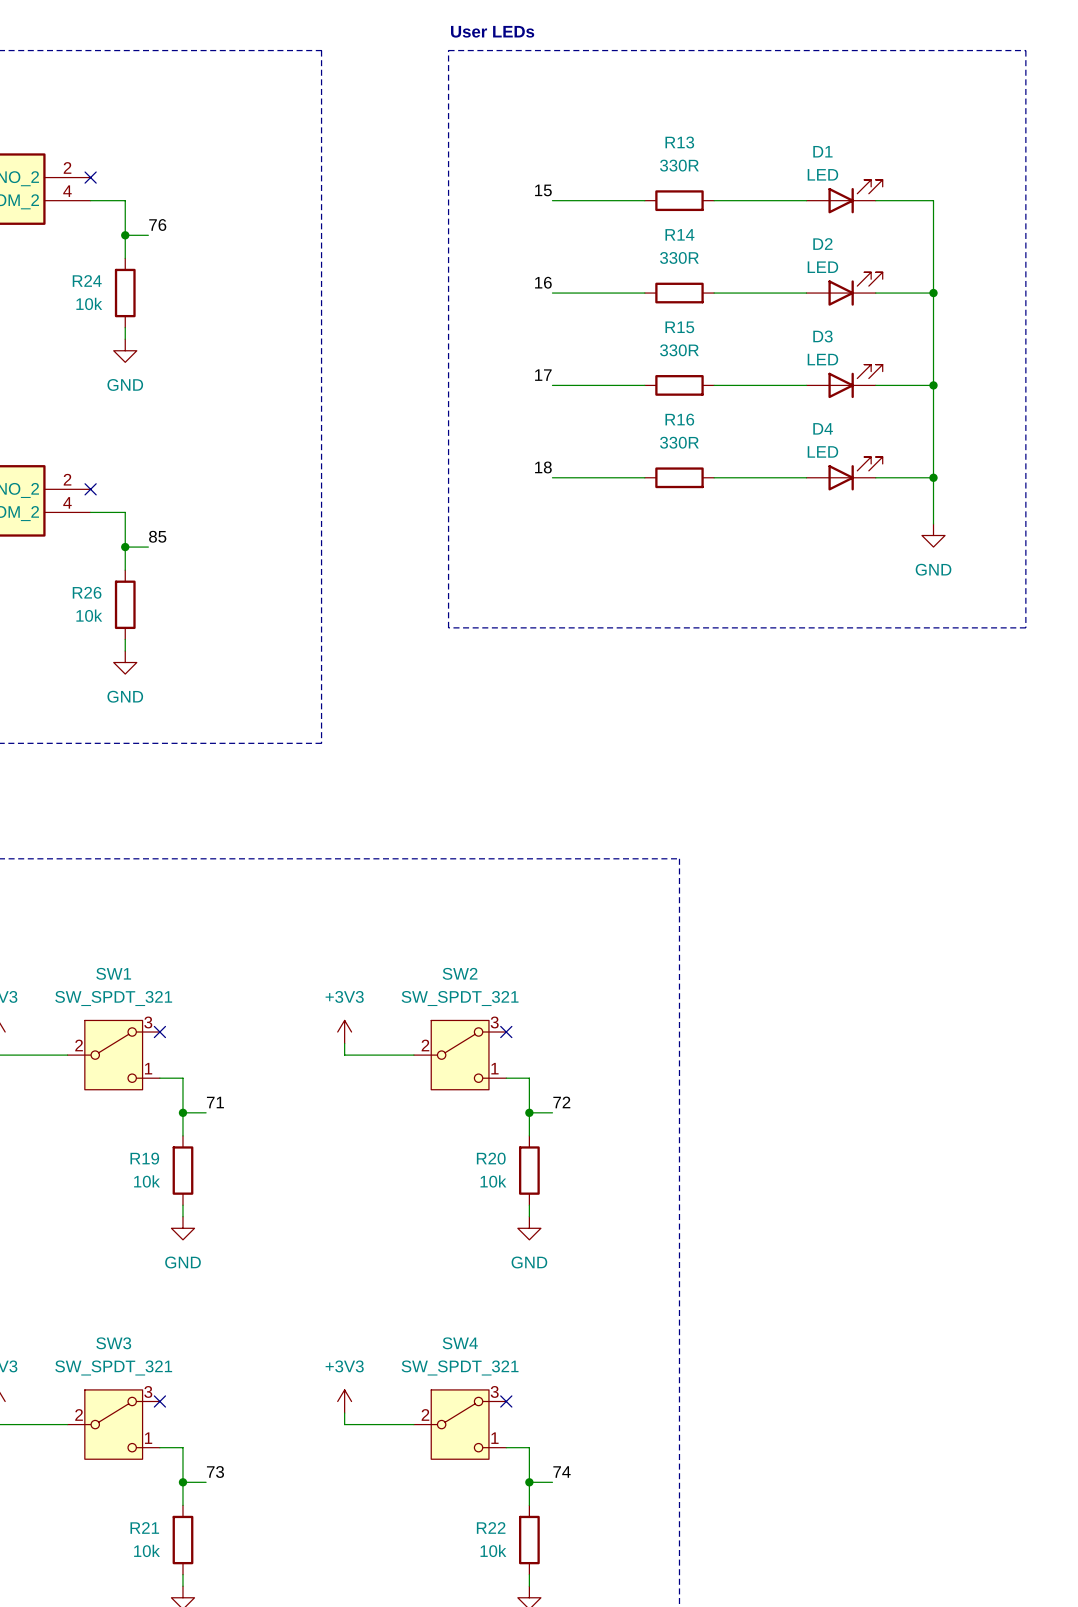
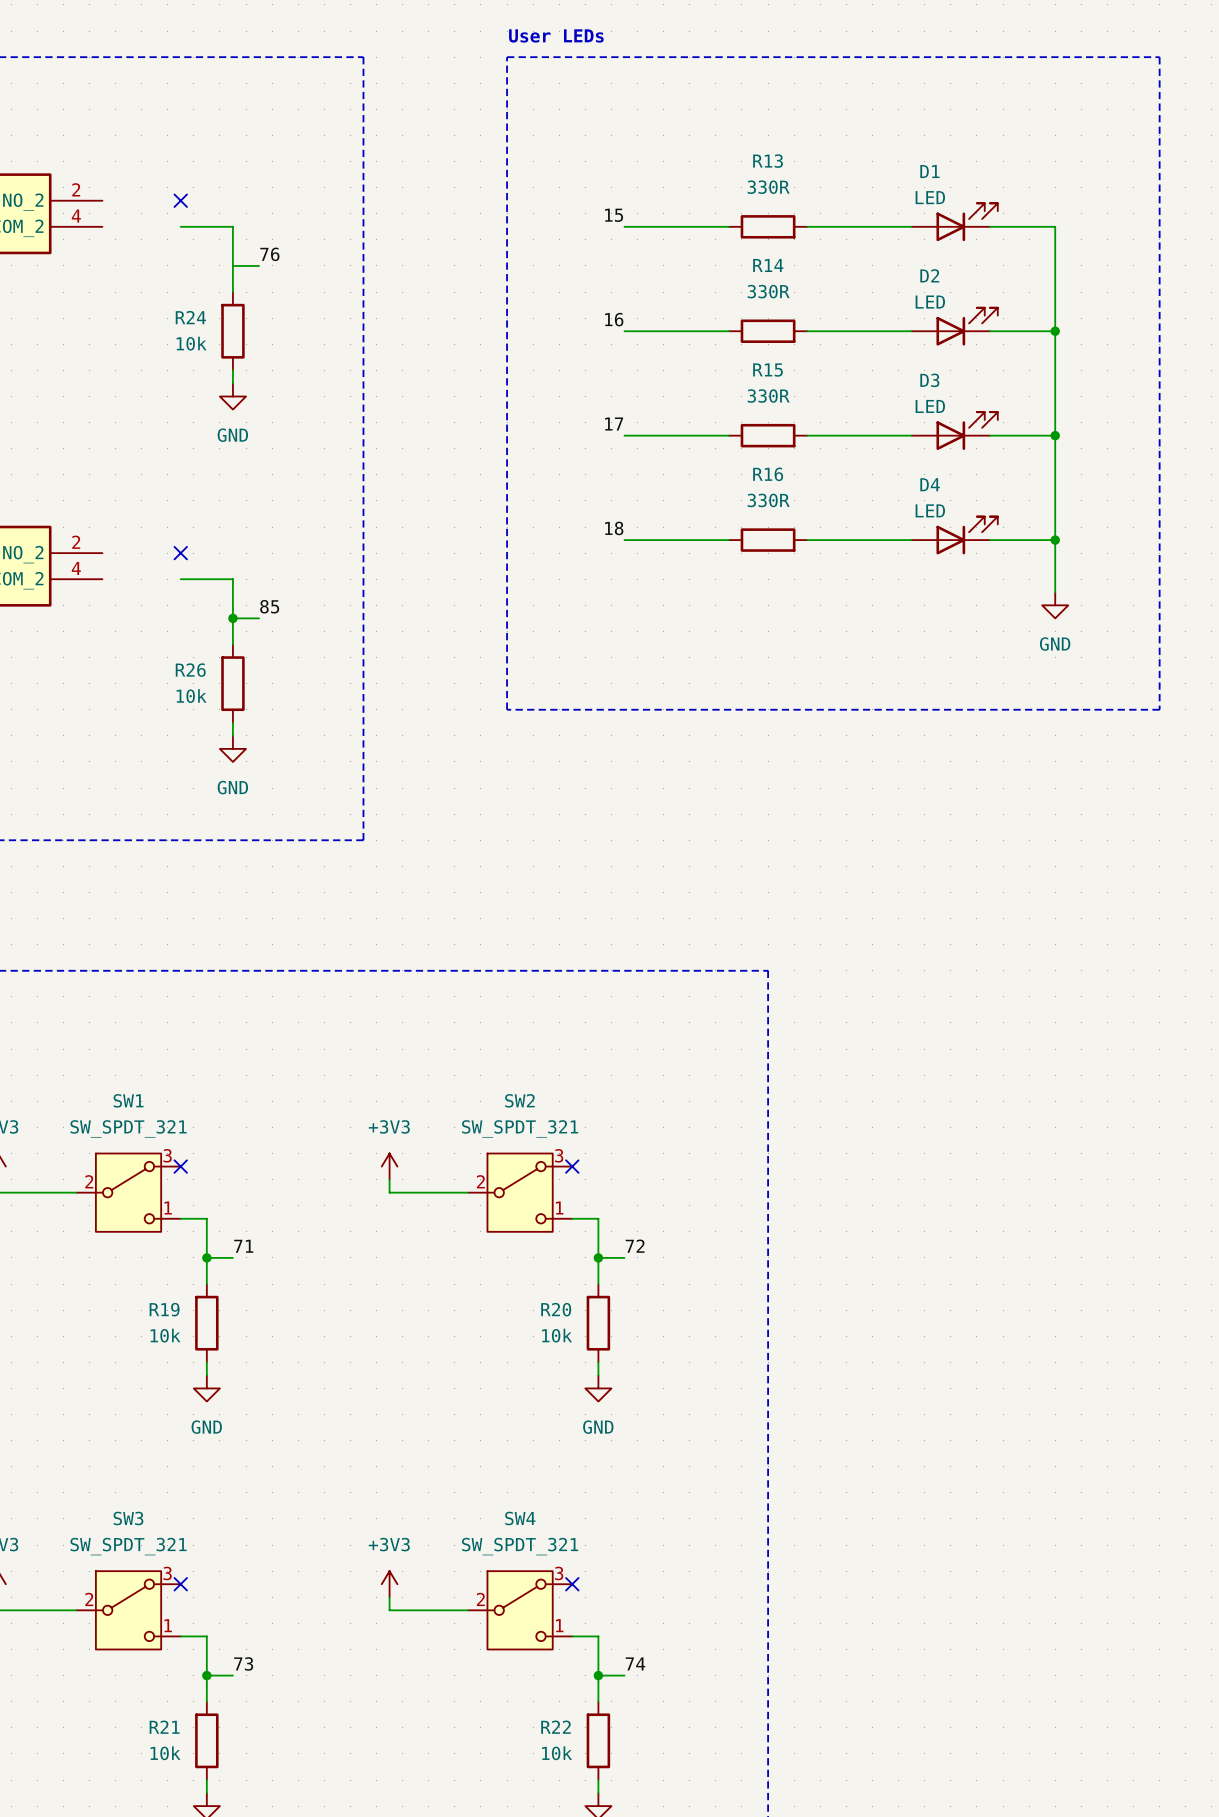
no-connect mark: (90, 177) -> none
no-connect mark: none -> (180, 200)
wire: (90, 200) (125, 200) (125, 258) -> none
wire: none -> (180, 226) (232, 226) (232, 292)
label position: 76 (157, 224) -> 76 (269, 254)
wire: (125, 235) (148, 235) -> (232, 265) (259, 265)
junction: (125, 235) -> none
R24 position: (125, 293) -> (232, 331)
wire: (125, 327) (125, 339) -> (232, 370) (232, 383)
power symbol position: GND (125, 350) -> GND (232, 396)
no-connect mark: (90, 489) -> none
no-connect mark: none -> (180, 553)
wire: (90, 512) (125, 512) (125, 570) -> none
wire: none -> (180, 579) (232, 579) (232, 644)
label position: 85 (157, 536) -> 85 (269, 606)
wire: (125, 547) (148, 547) -> (232, 618) (259, 618)
junction: (125, 547) -> none
junction: none -> (232, 618)
R26 position: (125, 604) -> (232, 683)
wire: (125, 639) (125, 650) -> (232, 722) (232, 735)
power symbol position: GND (125, 662) -> GND (232, 748)

